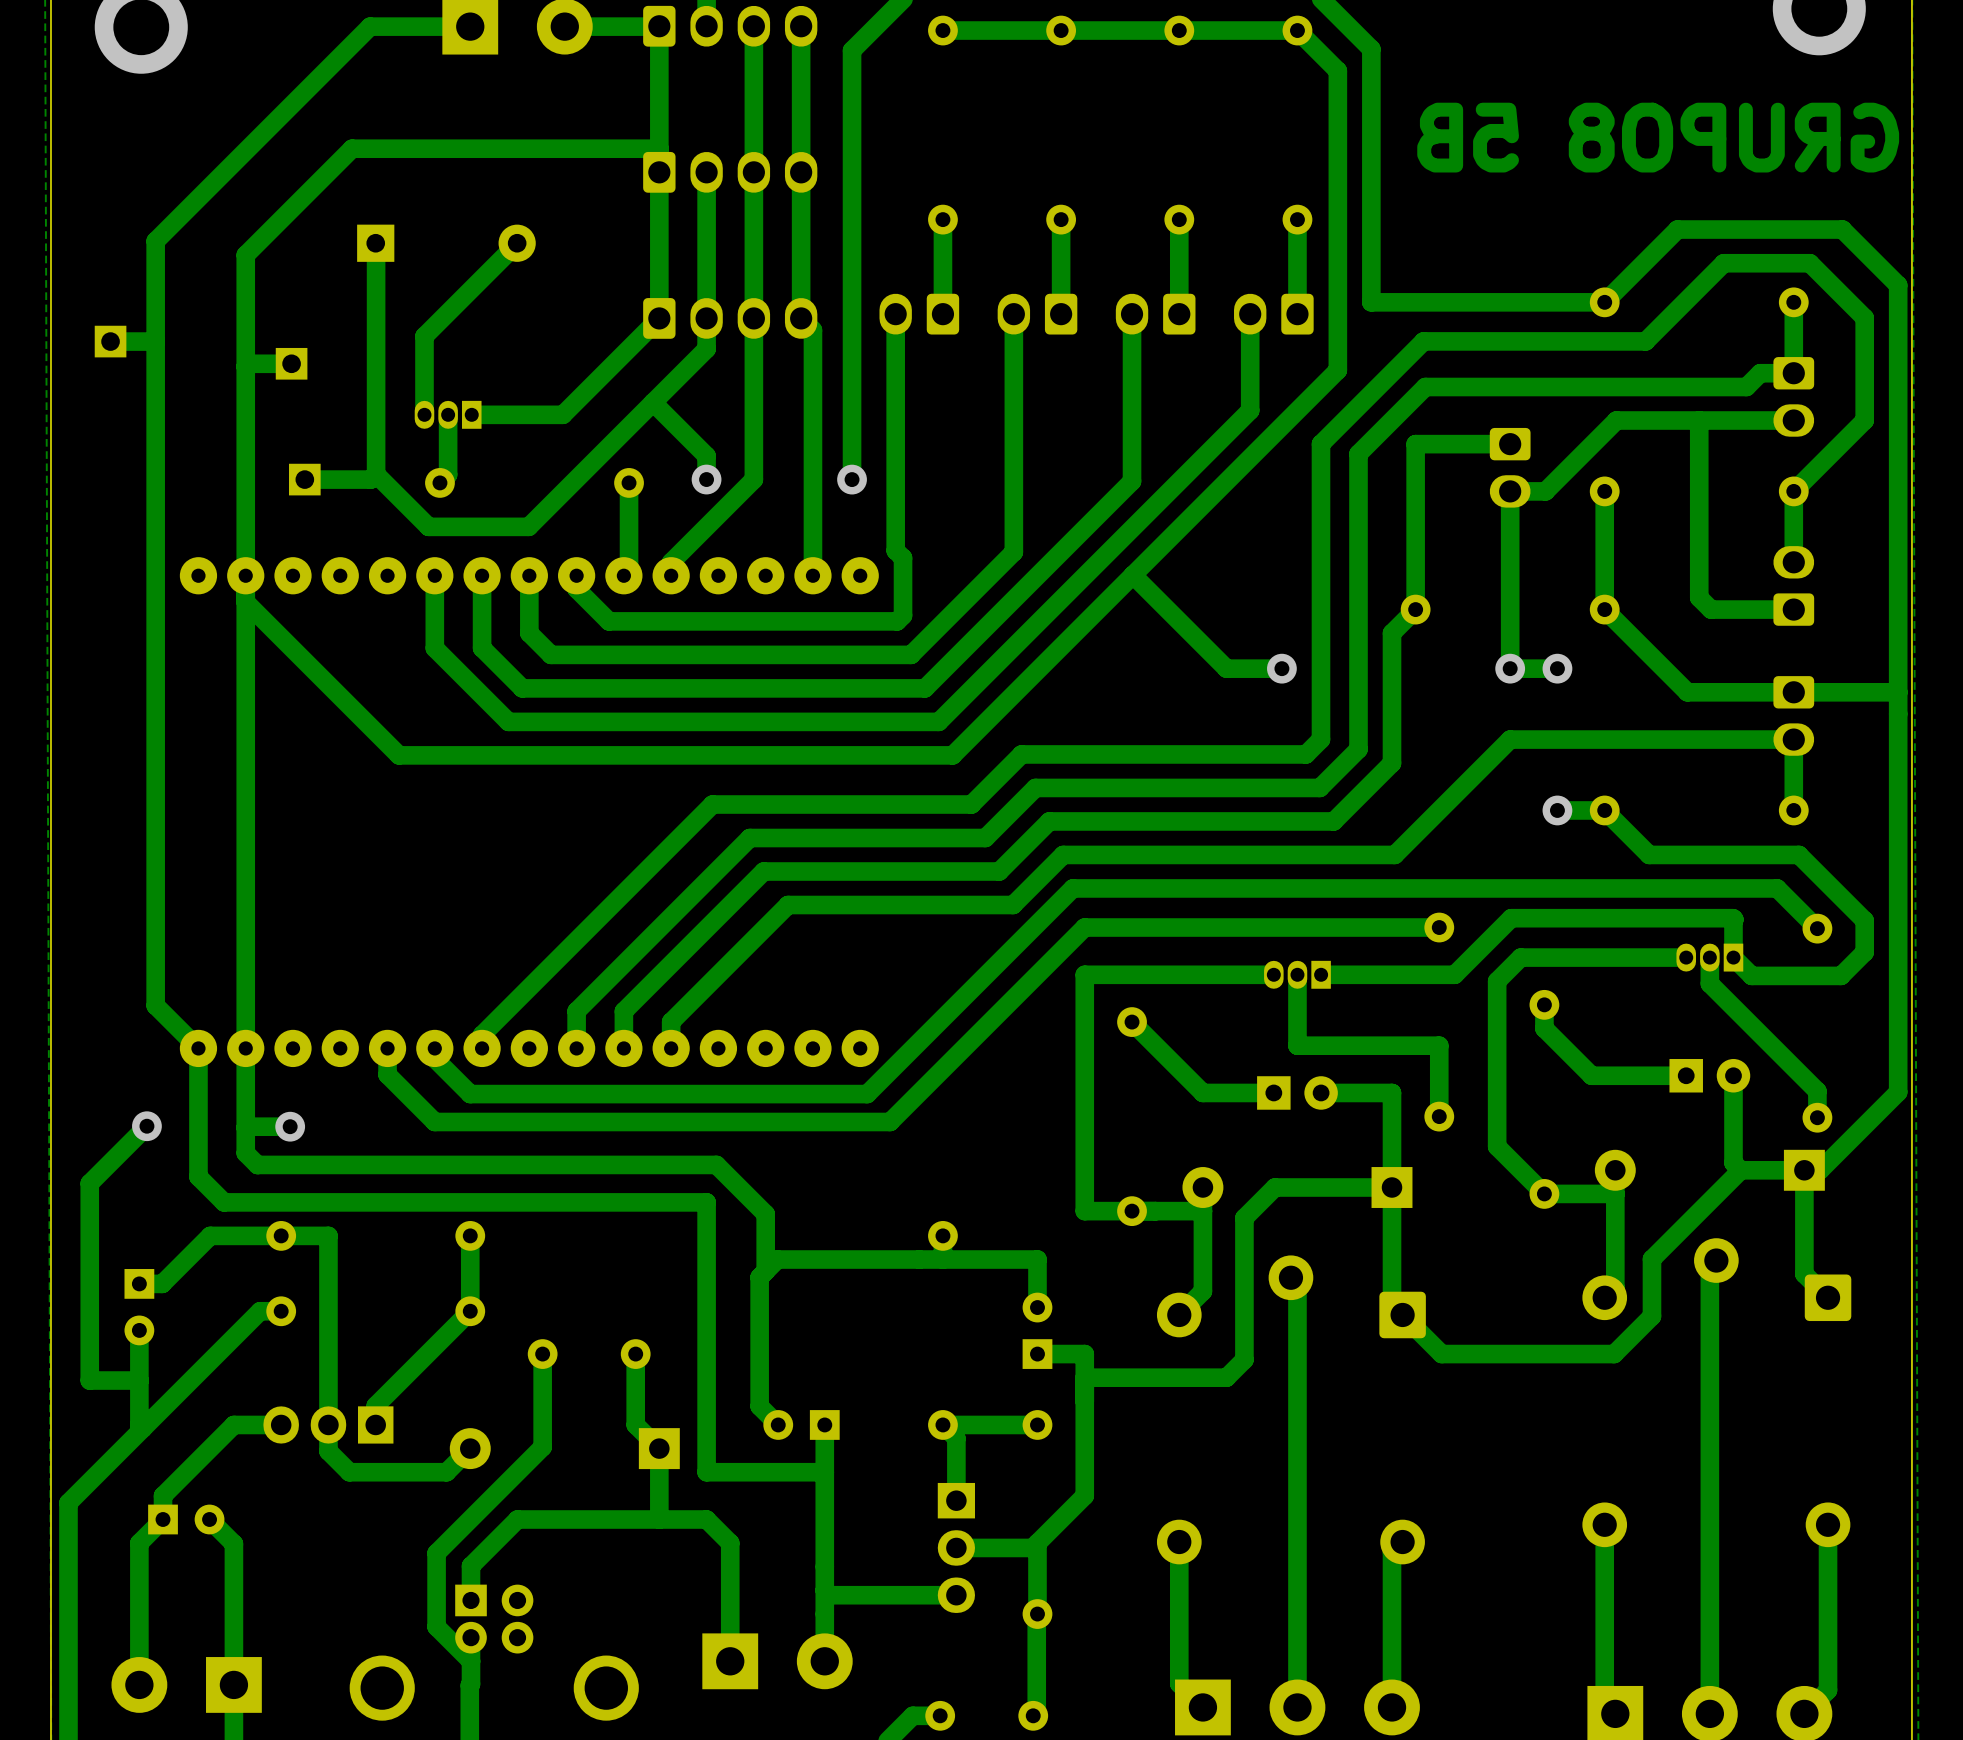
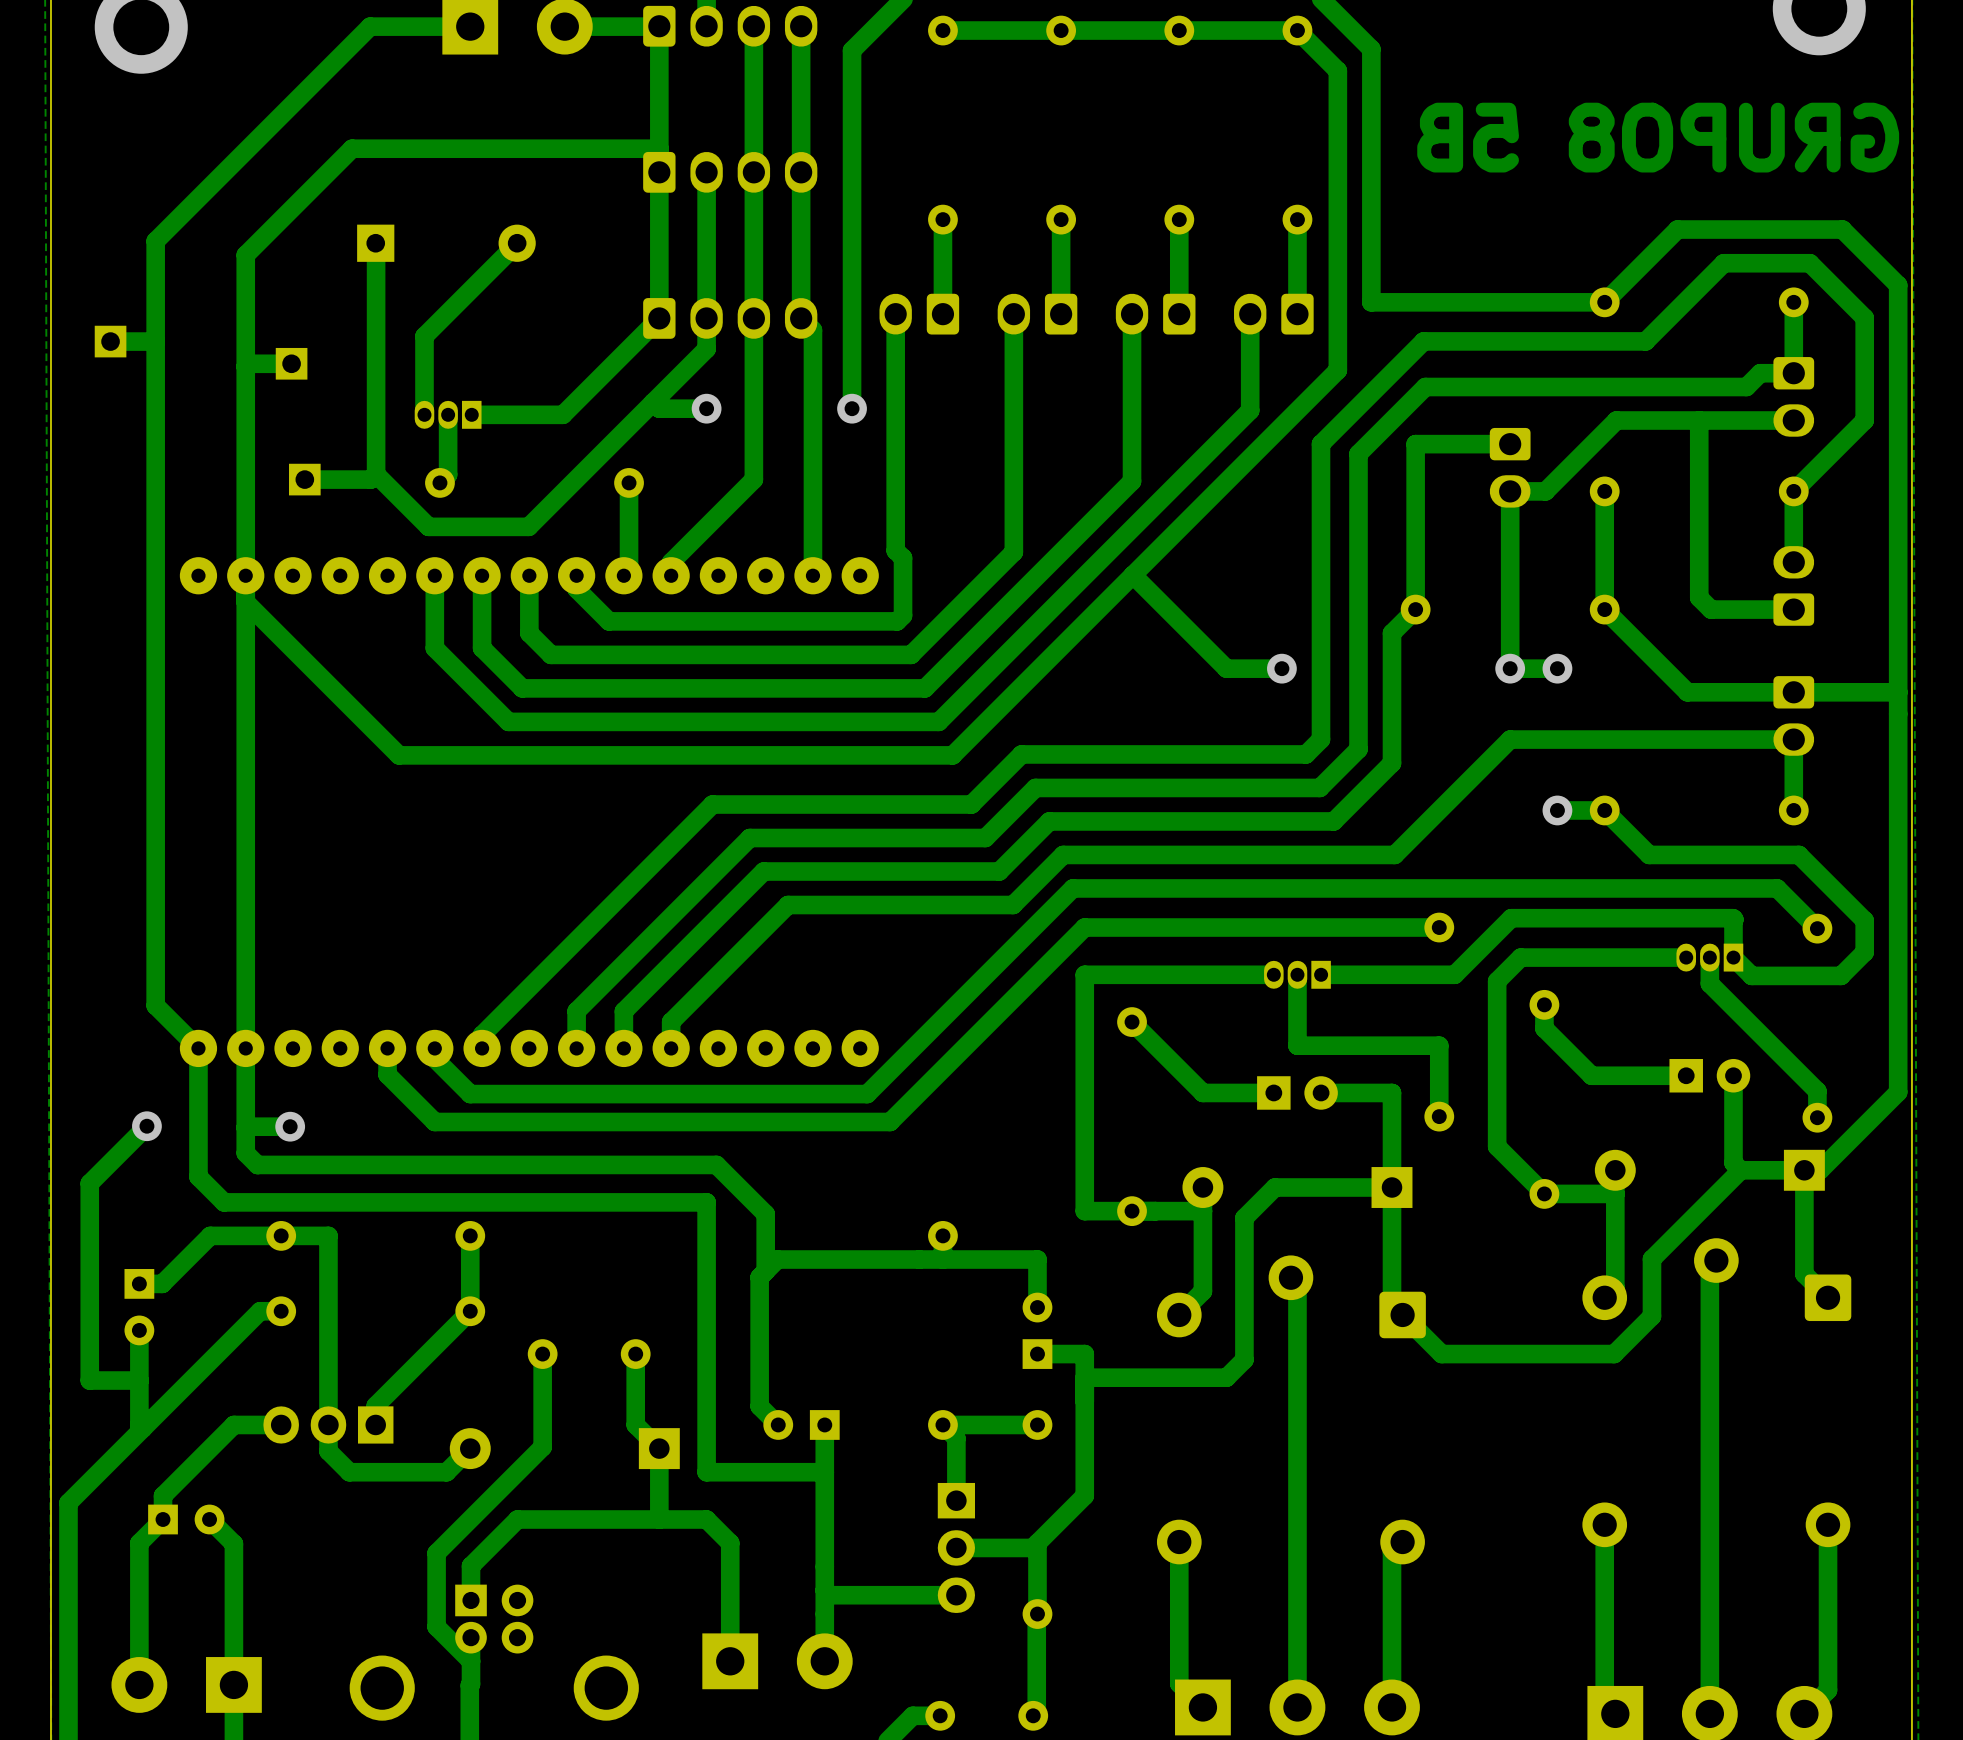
track: (659, 408) (706, 455) (706, 479) -> (659, 408) (706, 408)
track: (852, 408) (852, 479) -> none
via position: (706, 479) -> (706, 408)
via position: (852, 479) -> (852, 408)

